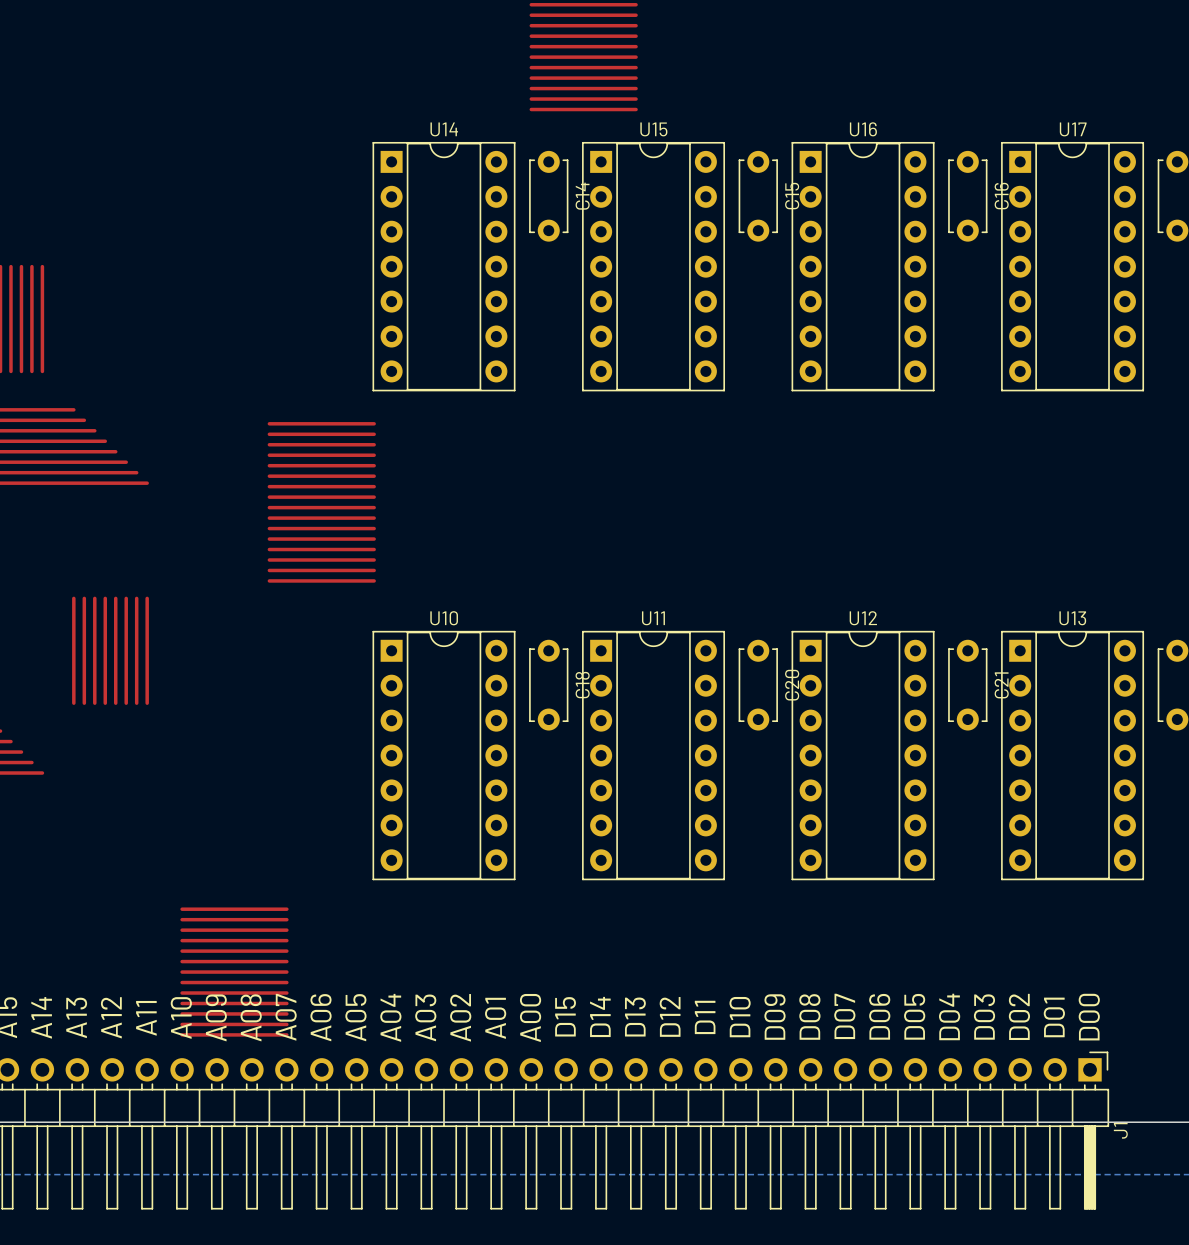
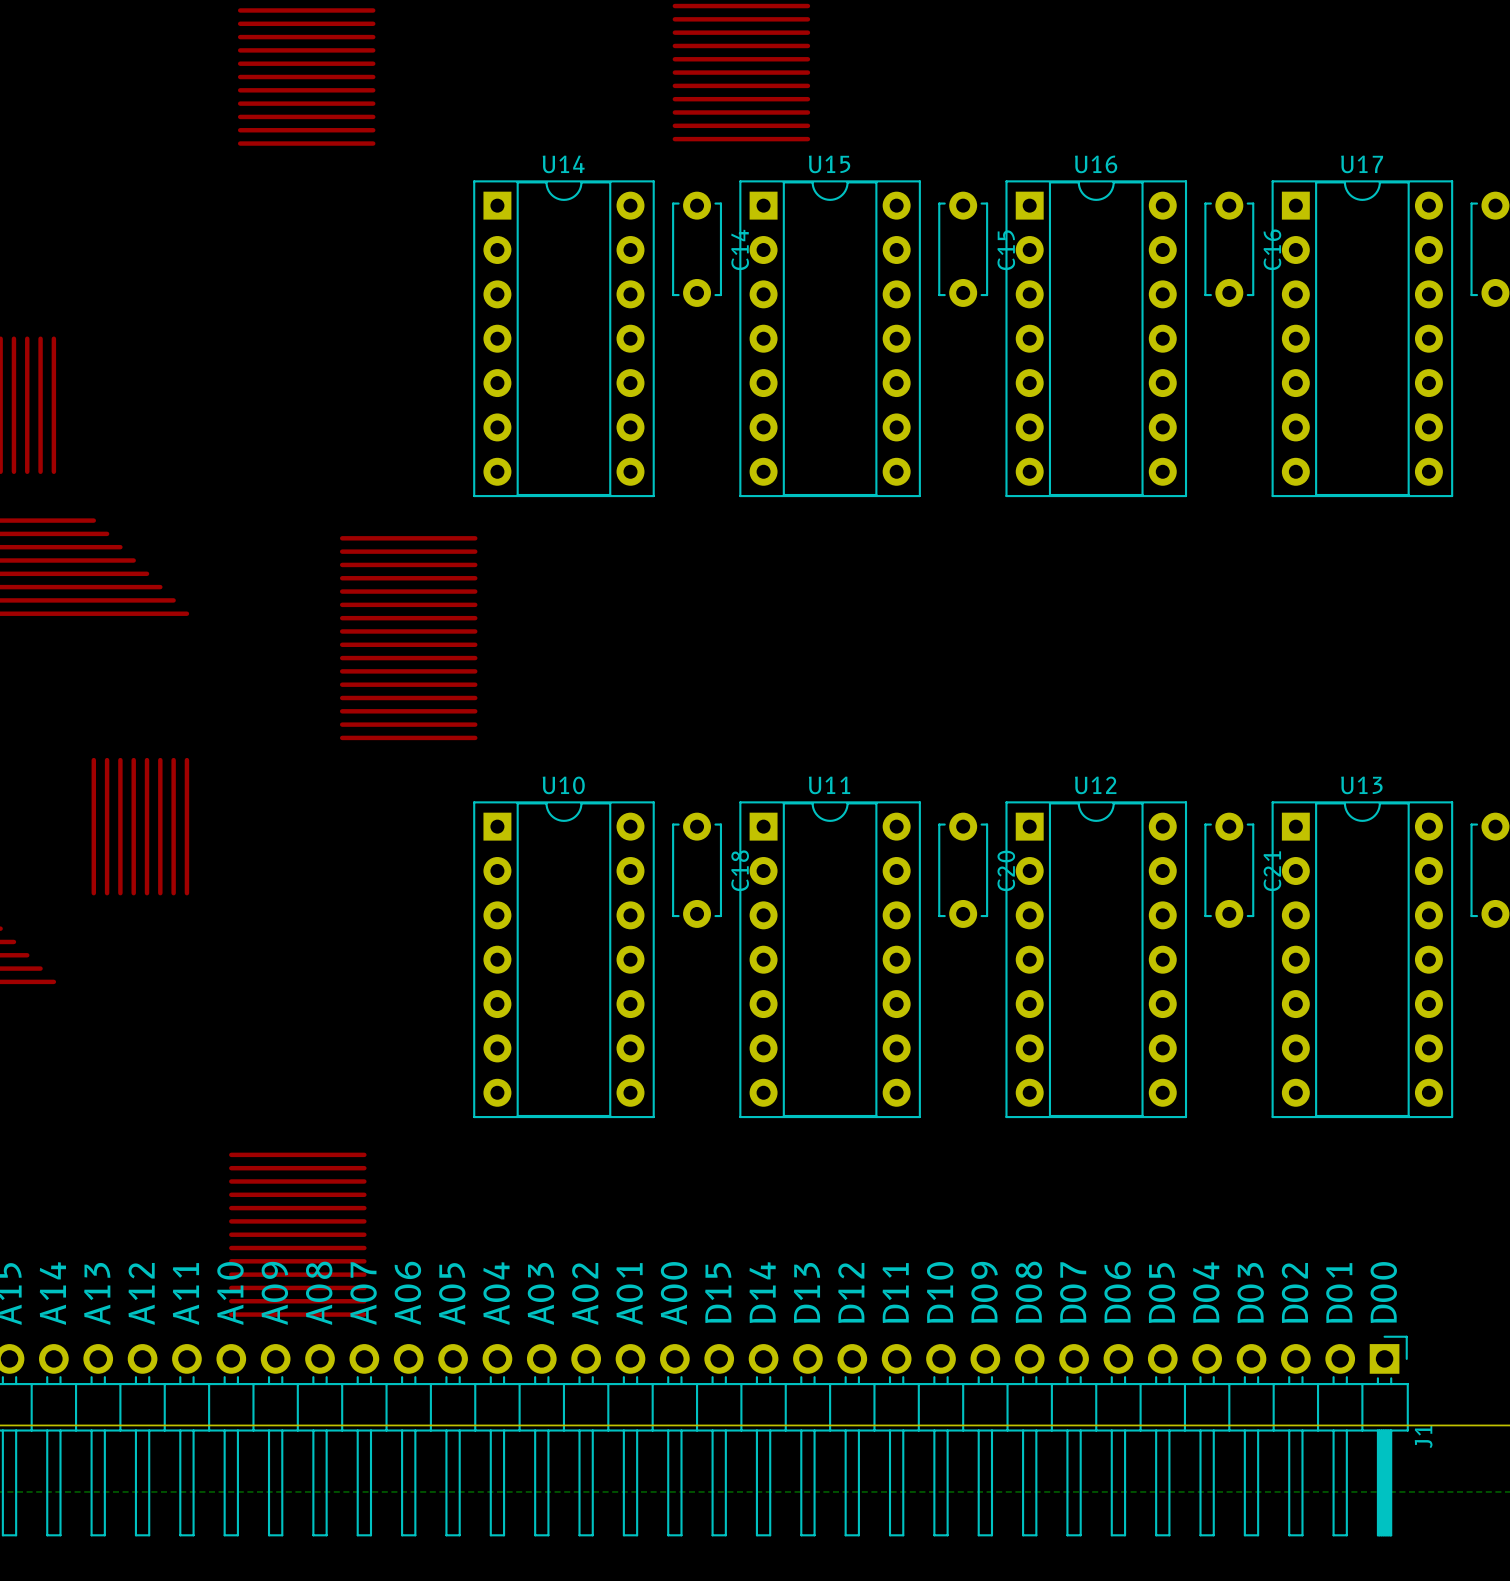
top track: none -> (240, 10) (373, 10)
top track: none -> (240, 23) (373, 23)
top track: none -> (240, 37) (373, 37)
top track: none -> (240, 50) (373, 50)
top track: none -> (240, 63) (373, 63)
top track: none -> (240, 77) (373, 77)
top track: none -> (240, 90) (373, 90)
top track: none -> (240, 103) (373, 103)
top track: none -> (240, 116) (373, 116)
top track: none -> (240, 130) (373, 130)
top track: none -> (240, 143) (373, 143)

